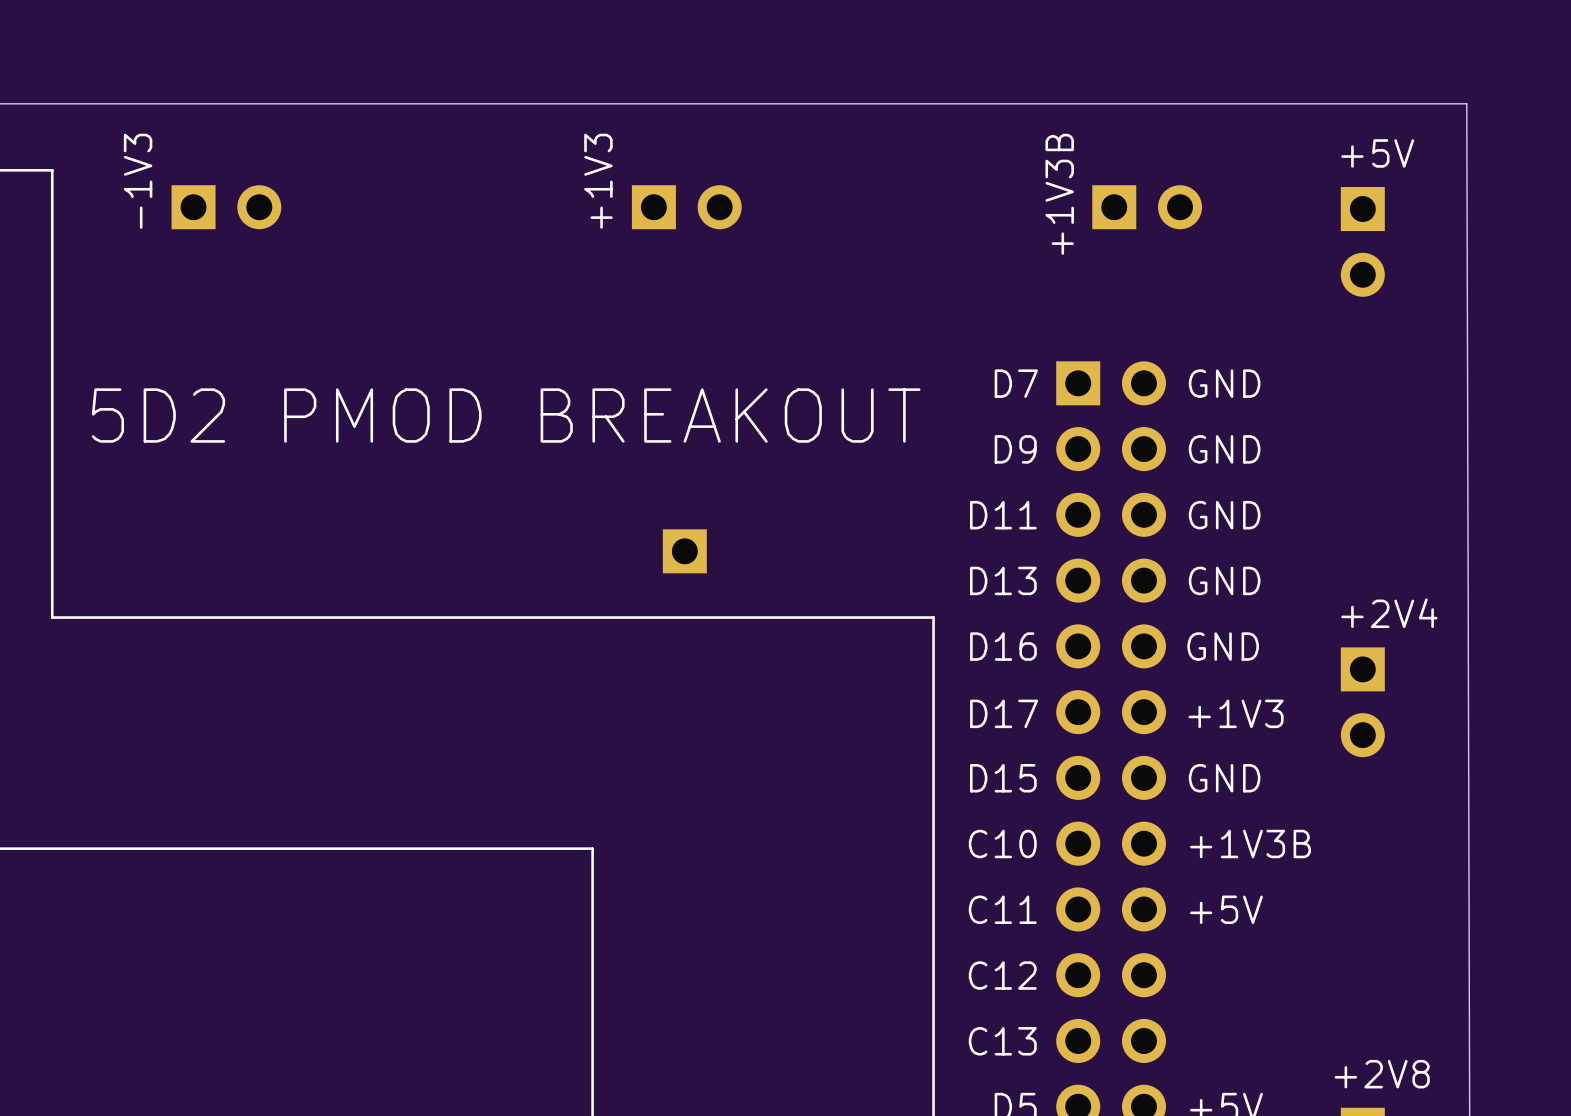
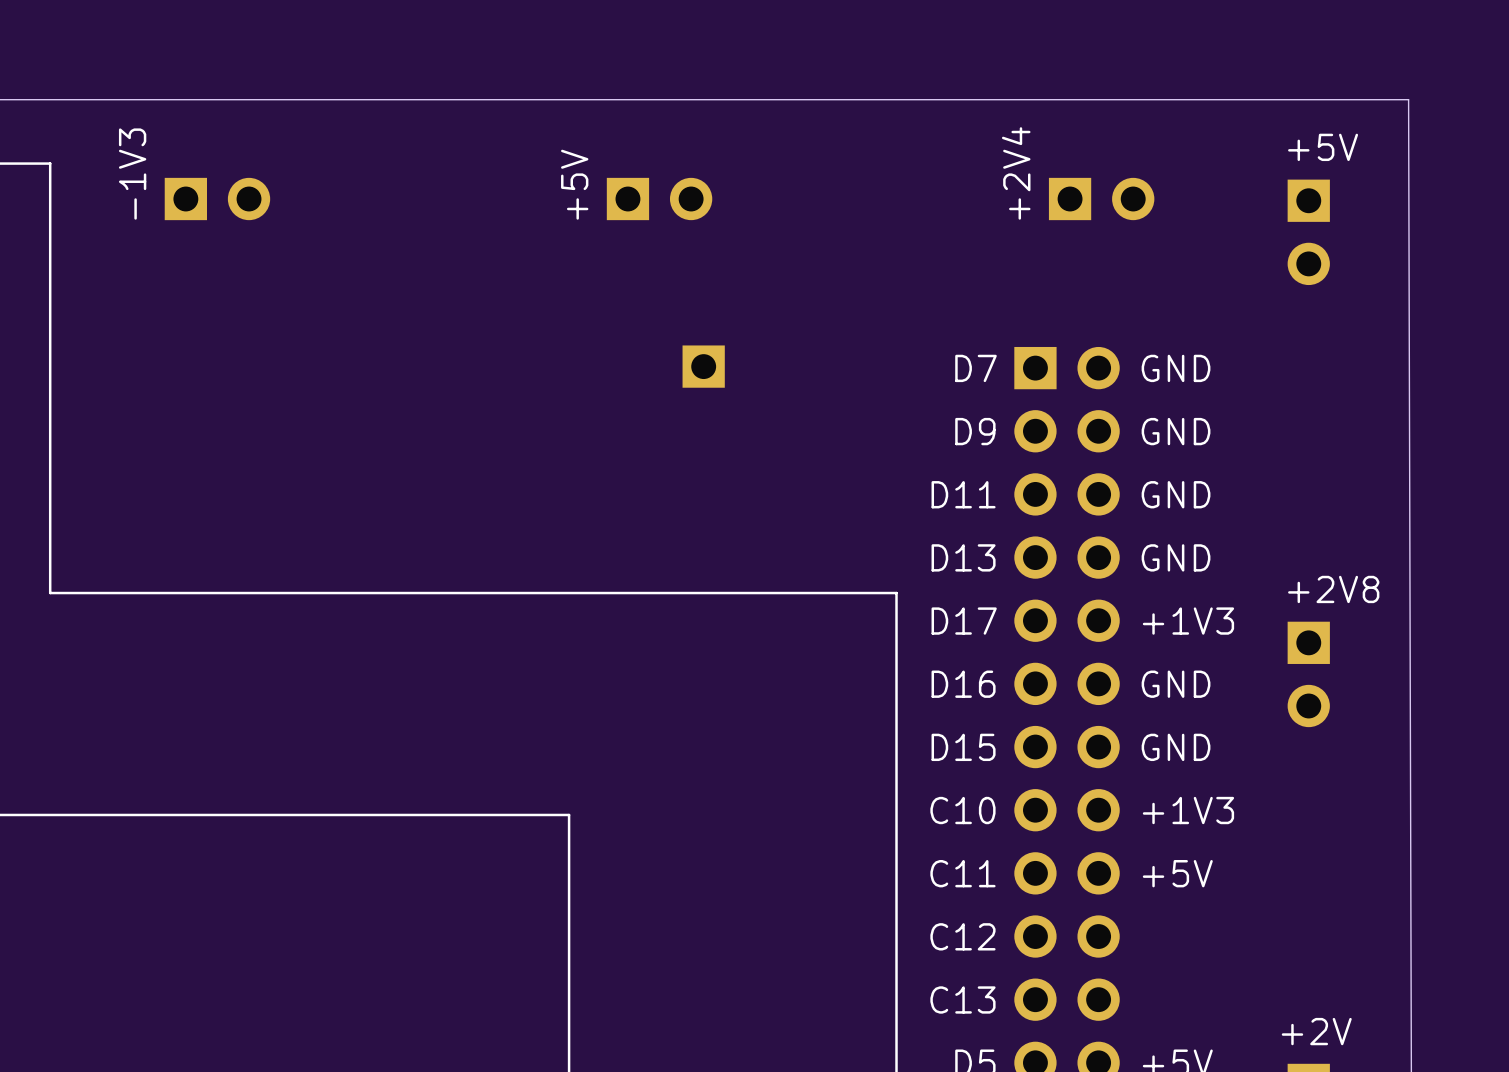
text: none -> +2V4 (1016, 173)
text: +1V3 (598, 181) -> +5V (574, 184)
text: +1V3B (1059, 194) -> none
text: 5D2 PMOD BREAKOUT (506, 415) -> none
part position: (684, 551) -> (703, 366)
text: +2V4 (1389, 613) -> +2V8 (1333, 589)
text: D16 (1003, 646) -> D17 (964, 621)
text: GND (1223, 646) -> +1V3 (1188, 621)
text: D17 (1004, 713) -> D16 (963, 684)
text: +1V3 (1236, 713) -> GND (1176, 684)
text: +1V3B (1250, 844) -> +1V3 (1188, 810)
text: +2V8 (1382, 1074) -> +2V (1316, 1031)

